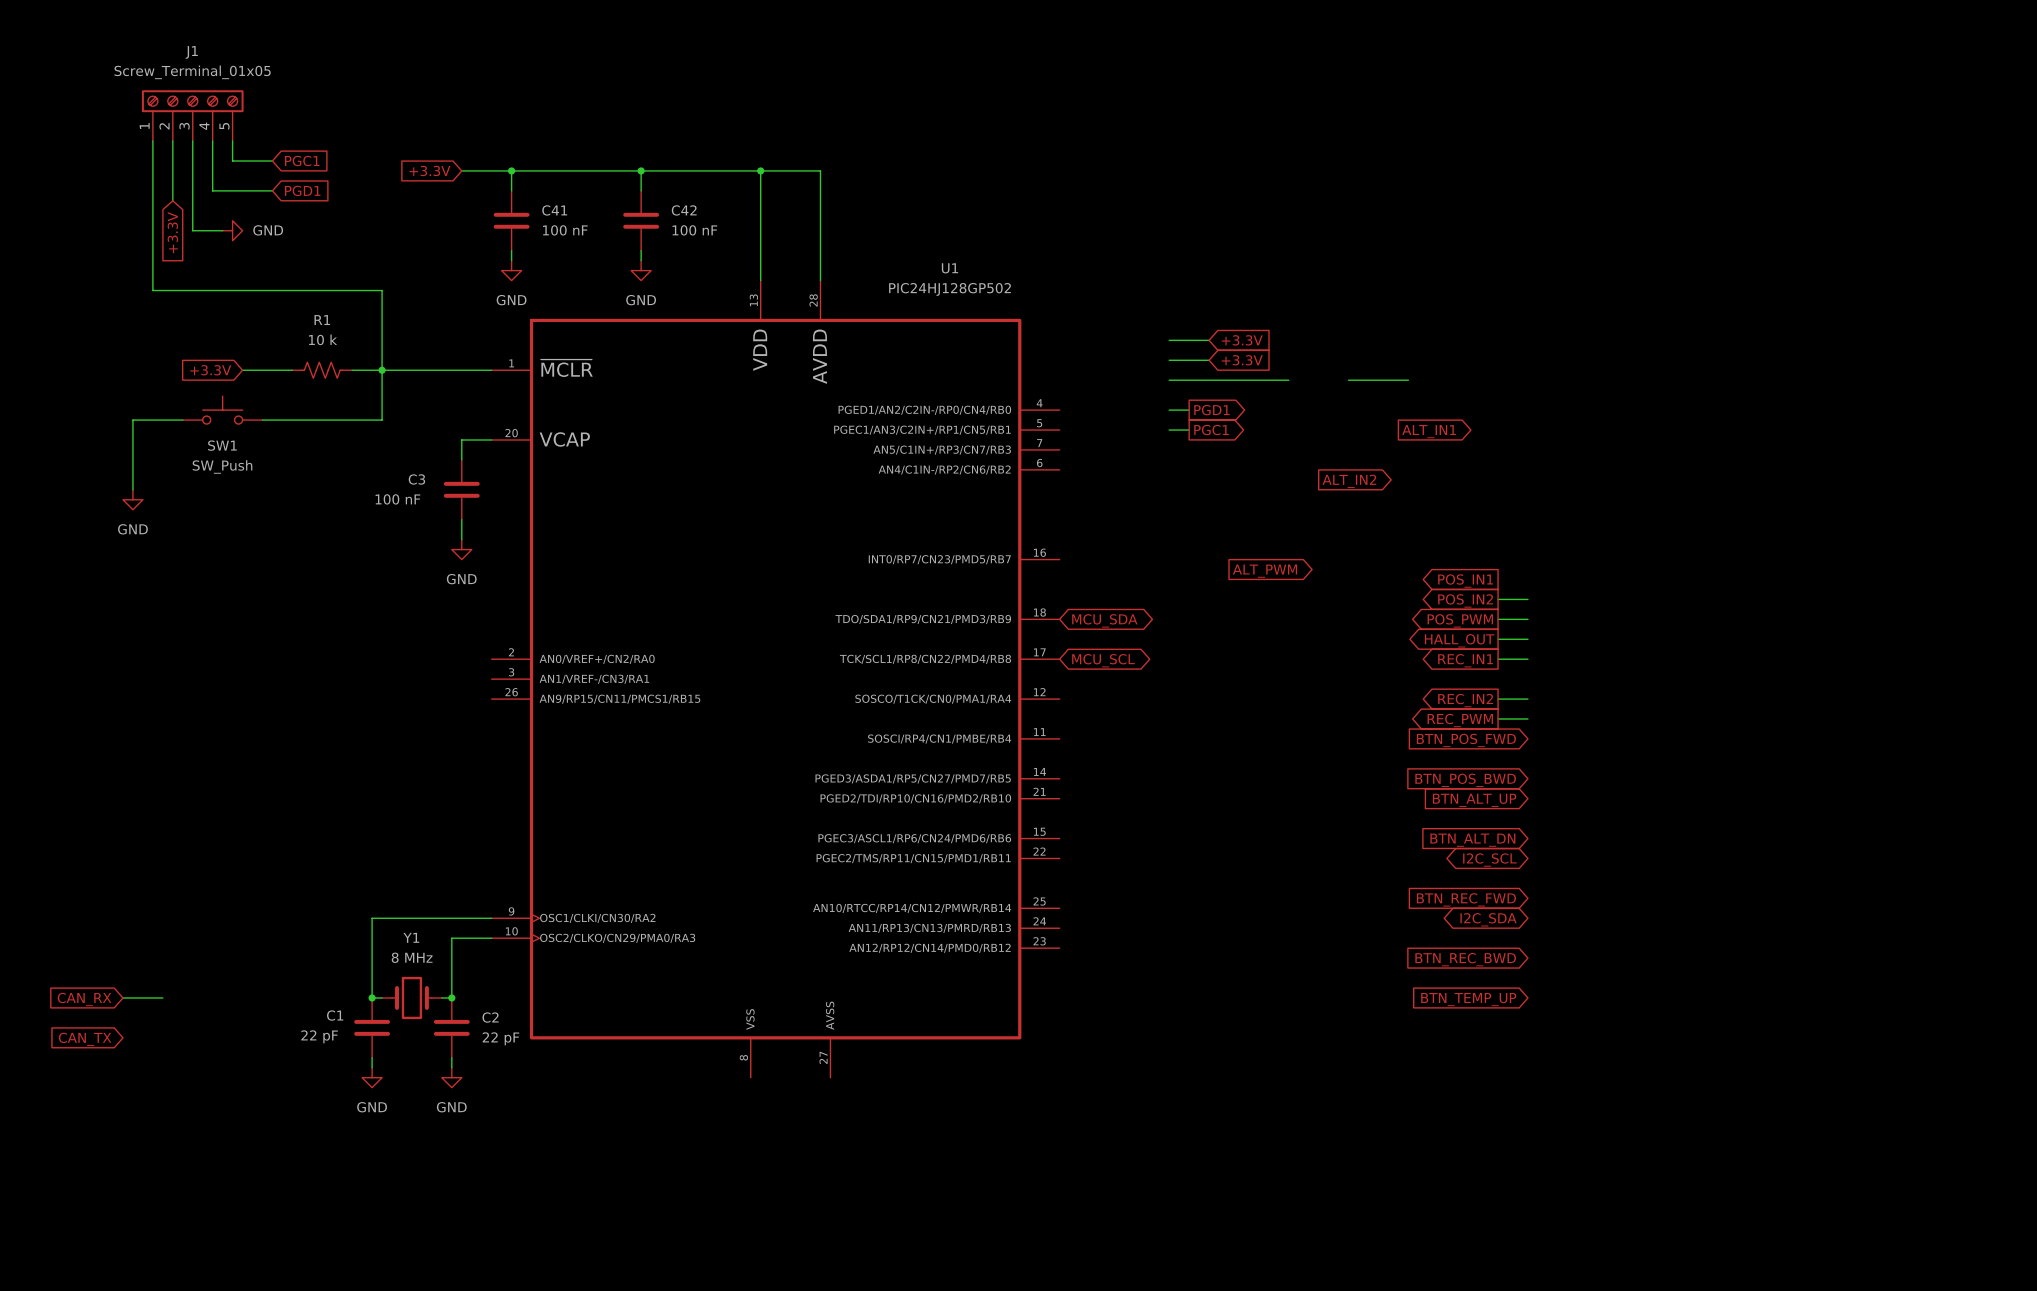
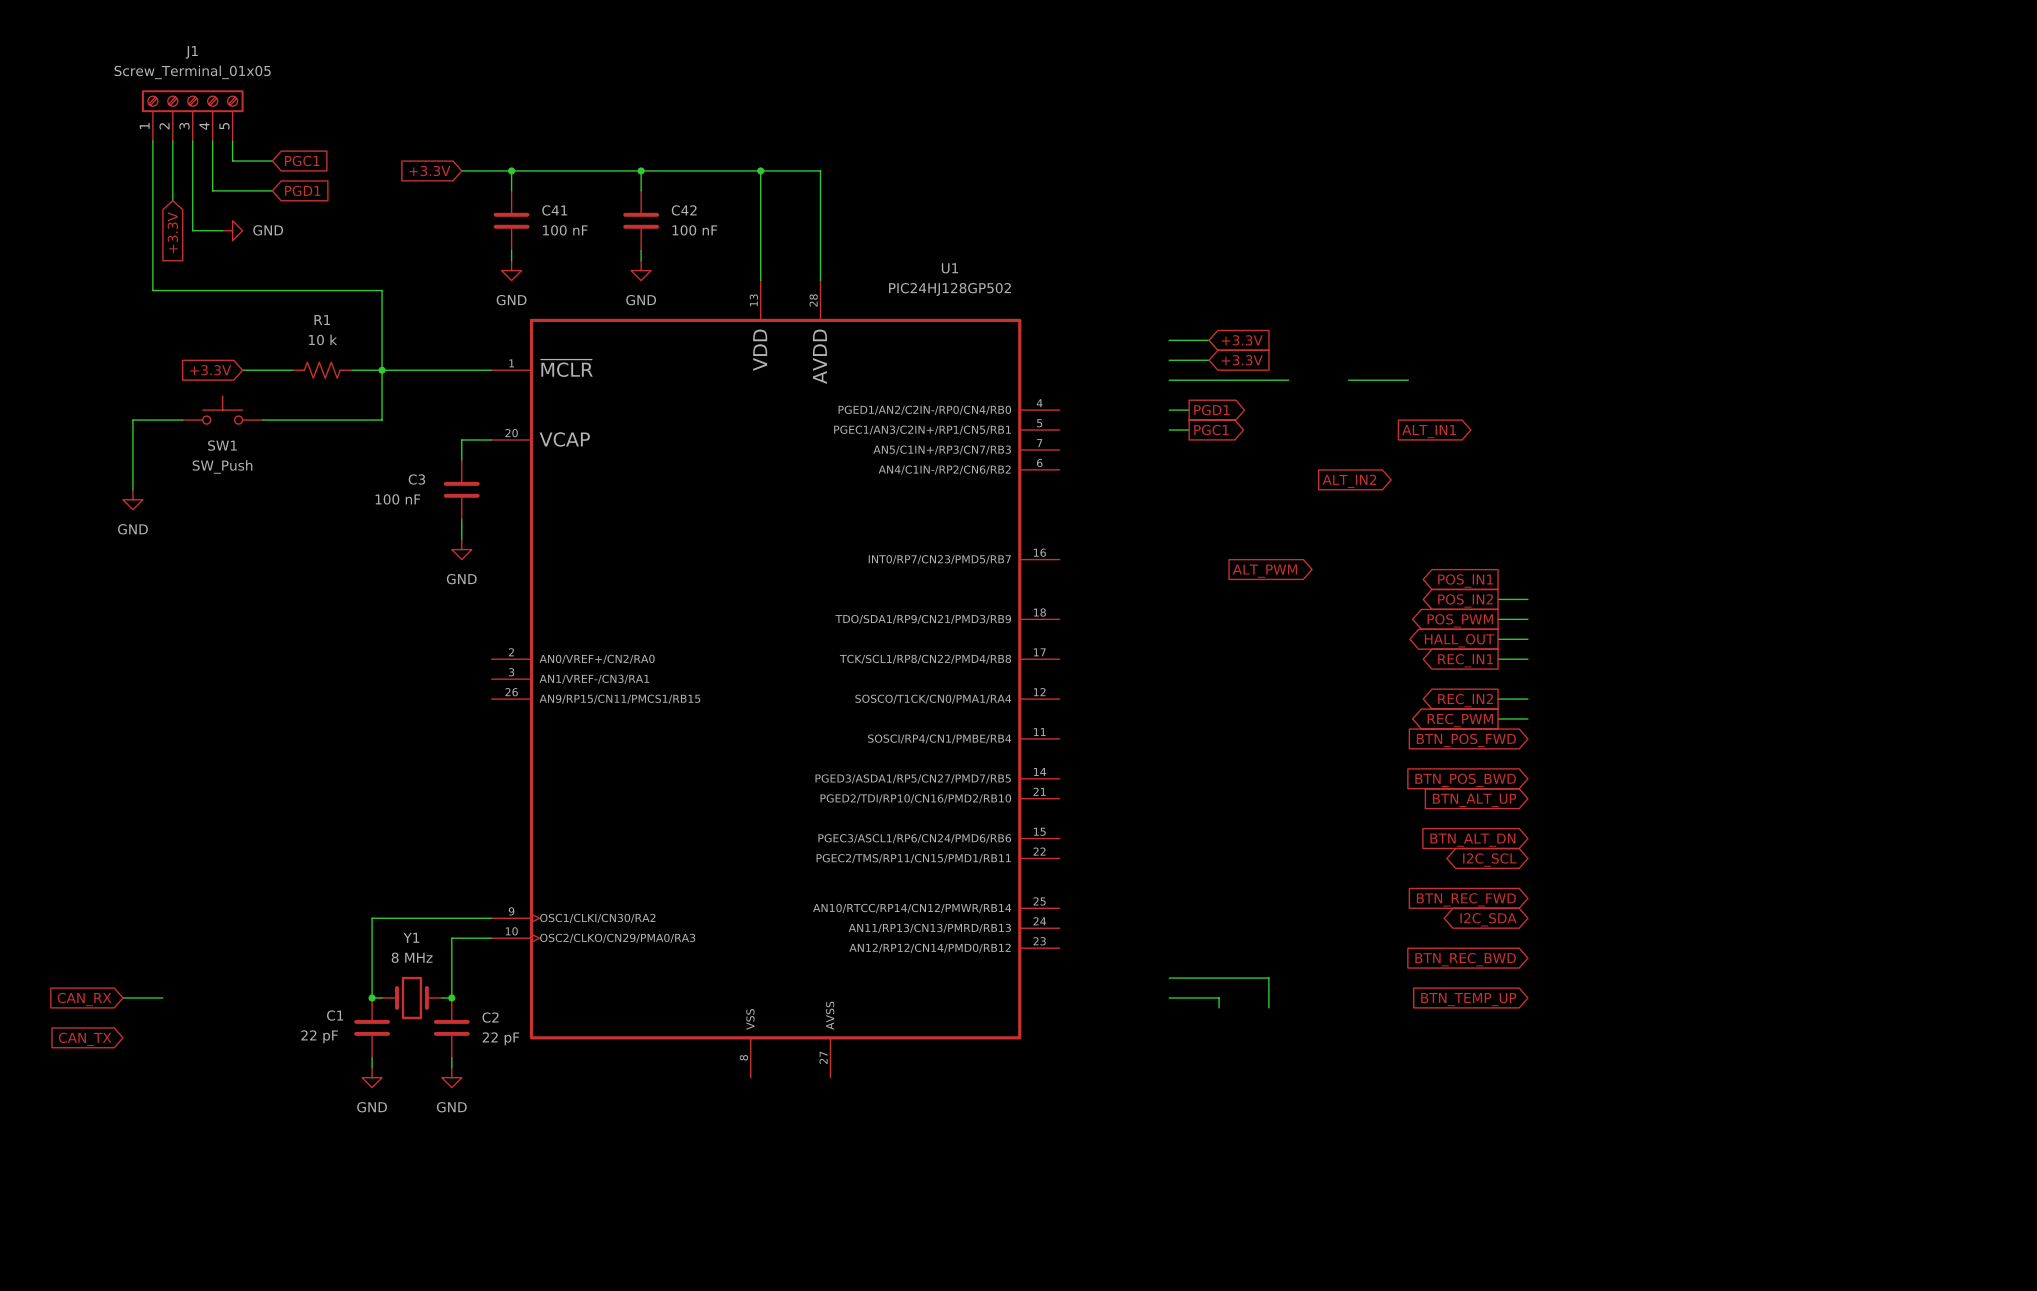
global label: MCU_SDA (1104, 620) -> none
global label: MCU_SCL (1103, 660) -> none
wire: none -> (1169, 978) (1268, 978) (1268, 1007)
wire: none -> (1169, 997) (1219, 997) (1219, 1007)

